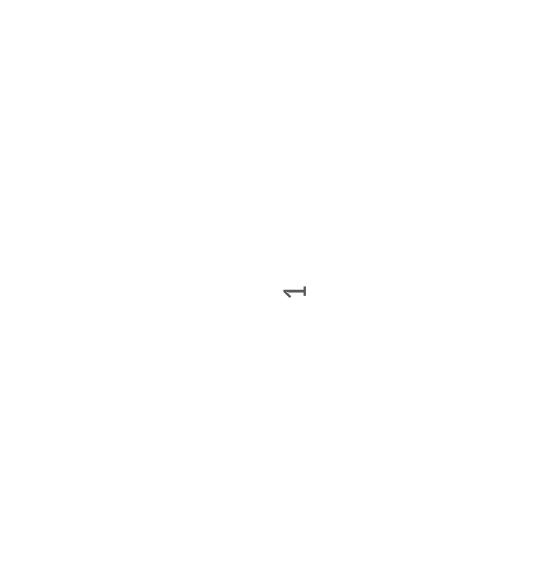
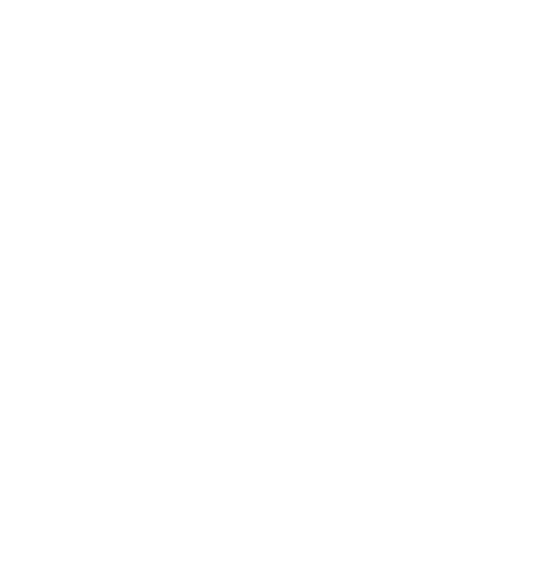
text: 1 (294, 292) -> none

